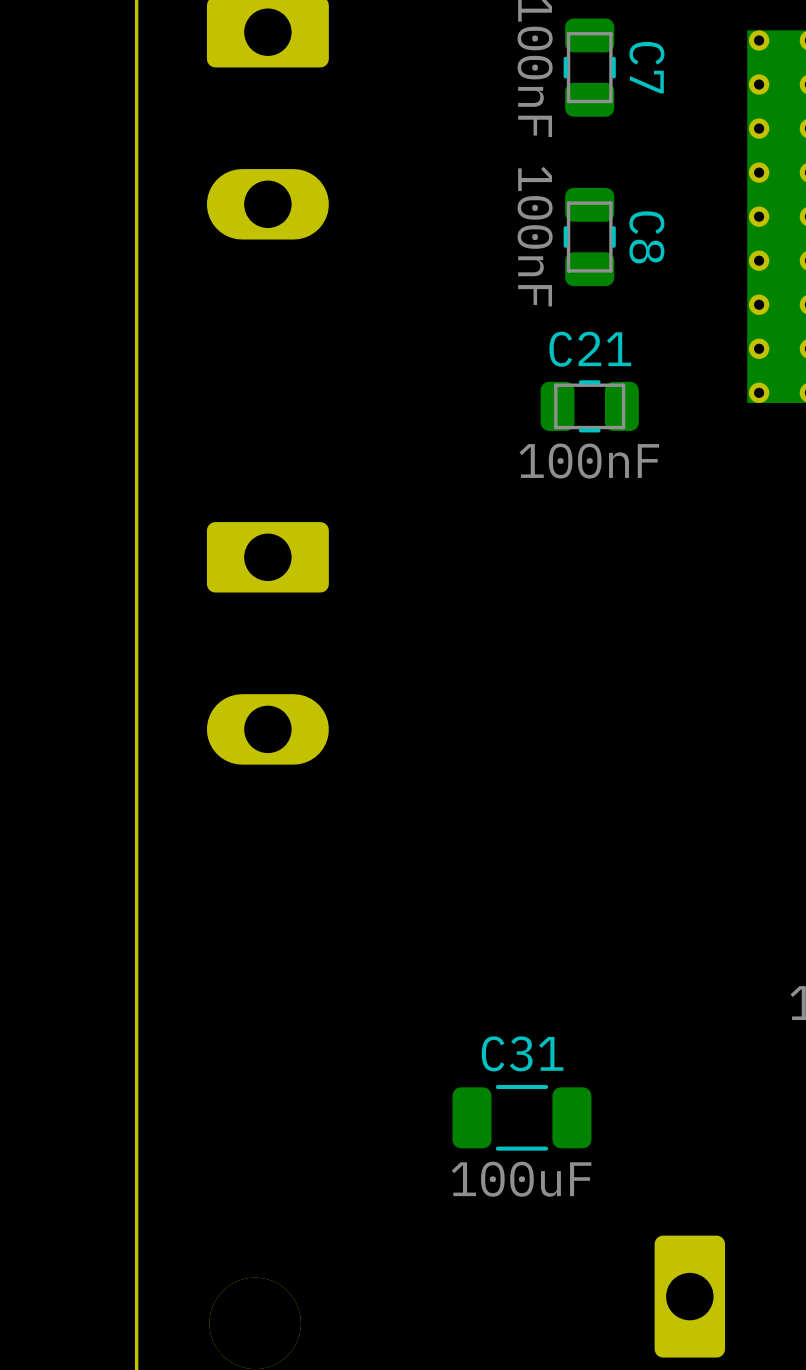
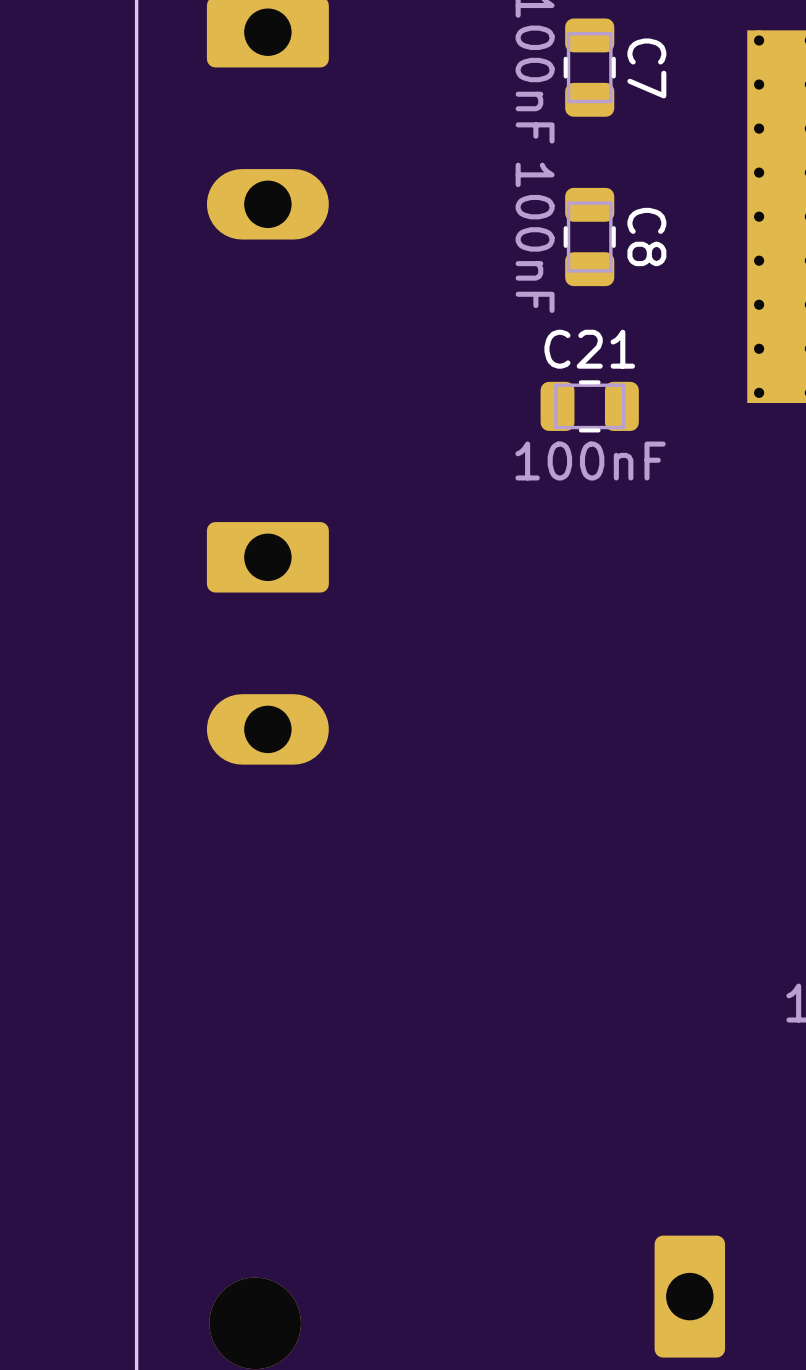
C31: 100uF (521, 1117) -> none

